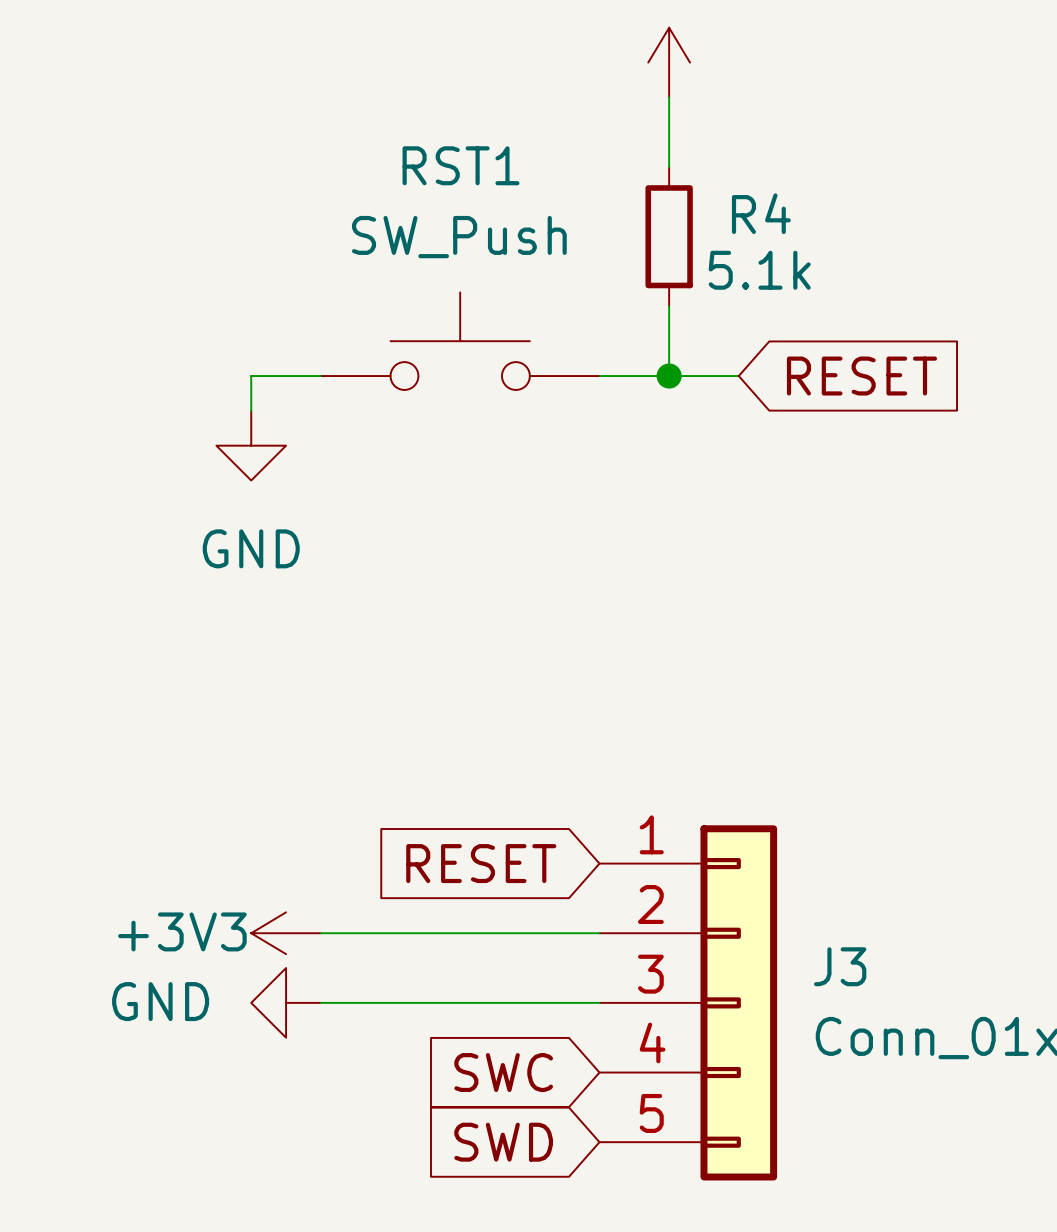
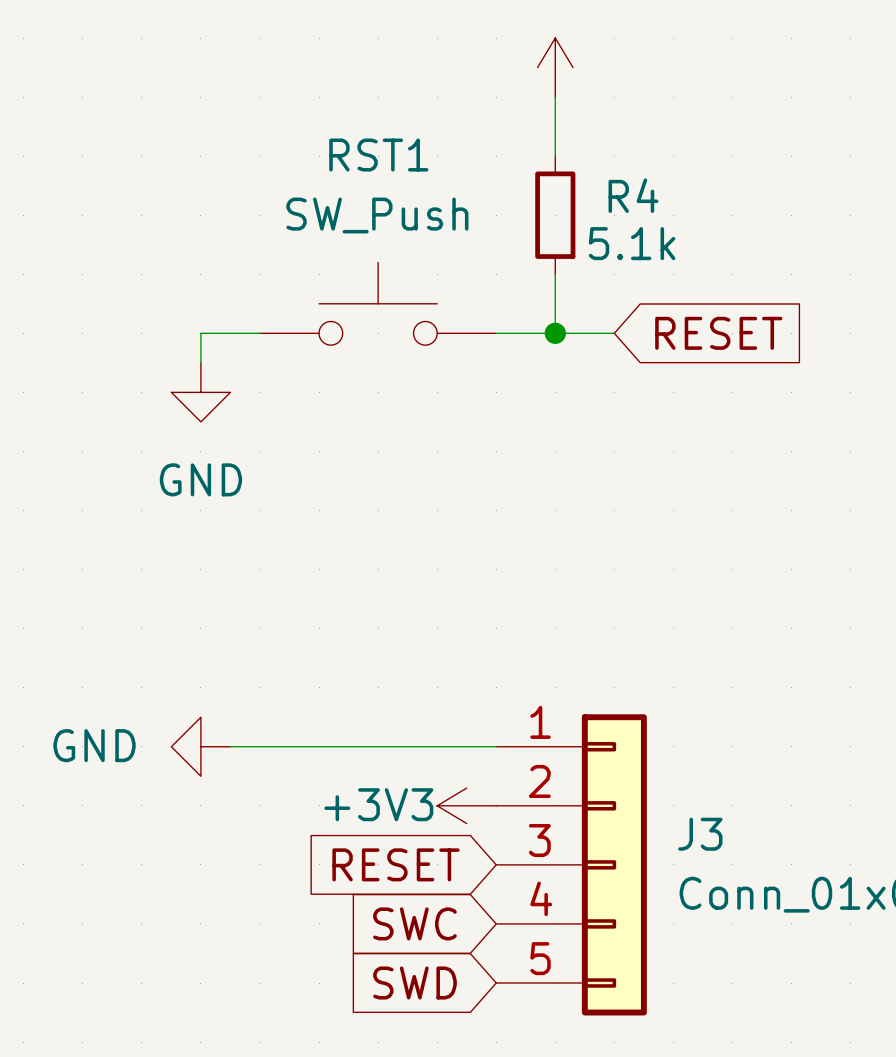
wire: none -> (230, 746) (496, 746)
global label position: RESET (481, 863) -> RESET (395, 864)
power symbol position: +3V3 (286, 933) -> +3V3 (466, 805)
wire: (320, 933) (599, 933) -> none
power symbol position: GND (286, 1002) -> GND (200, 746)
wire: (320, 1002) (599, 1002) -> none

